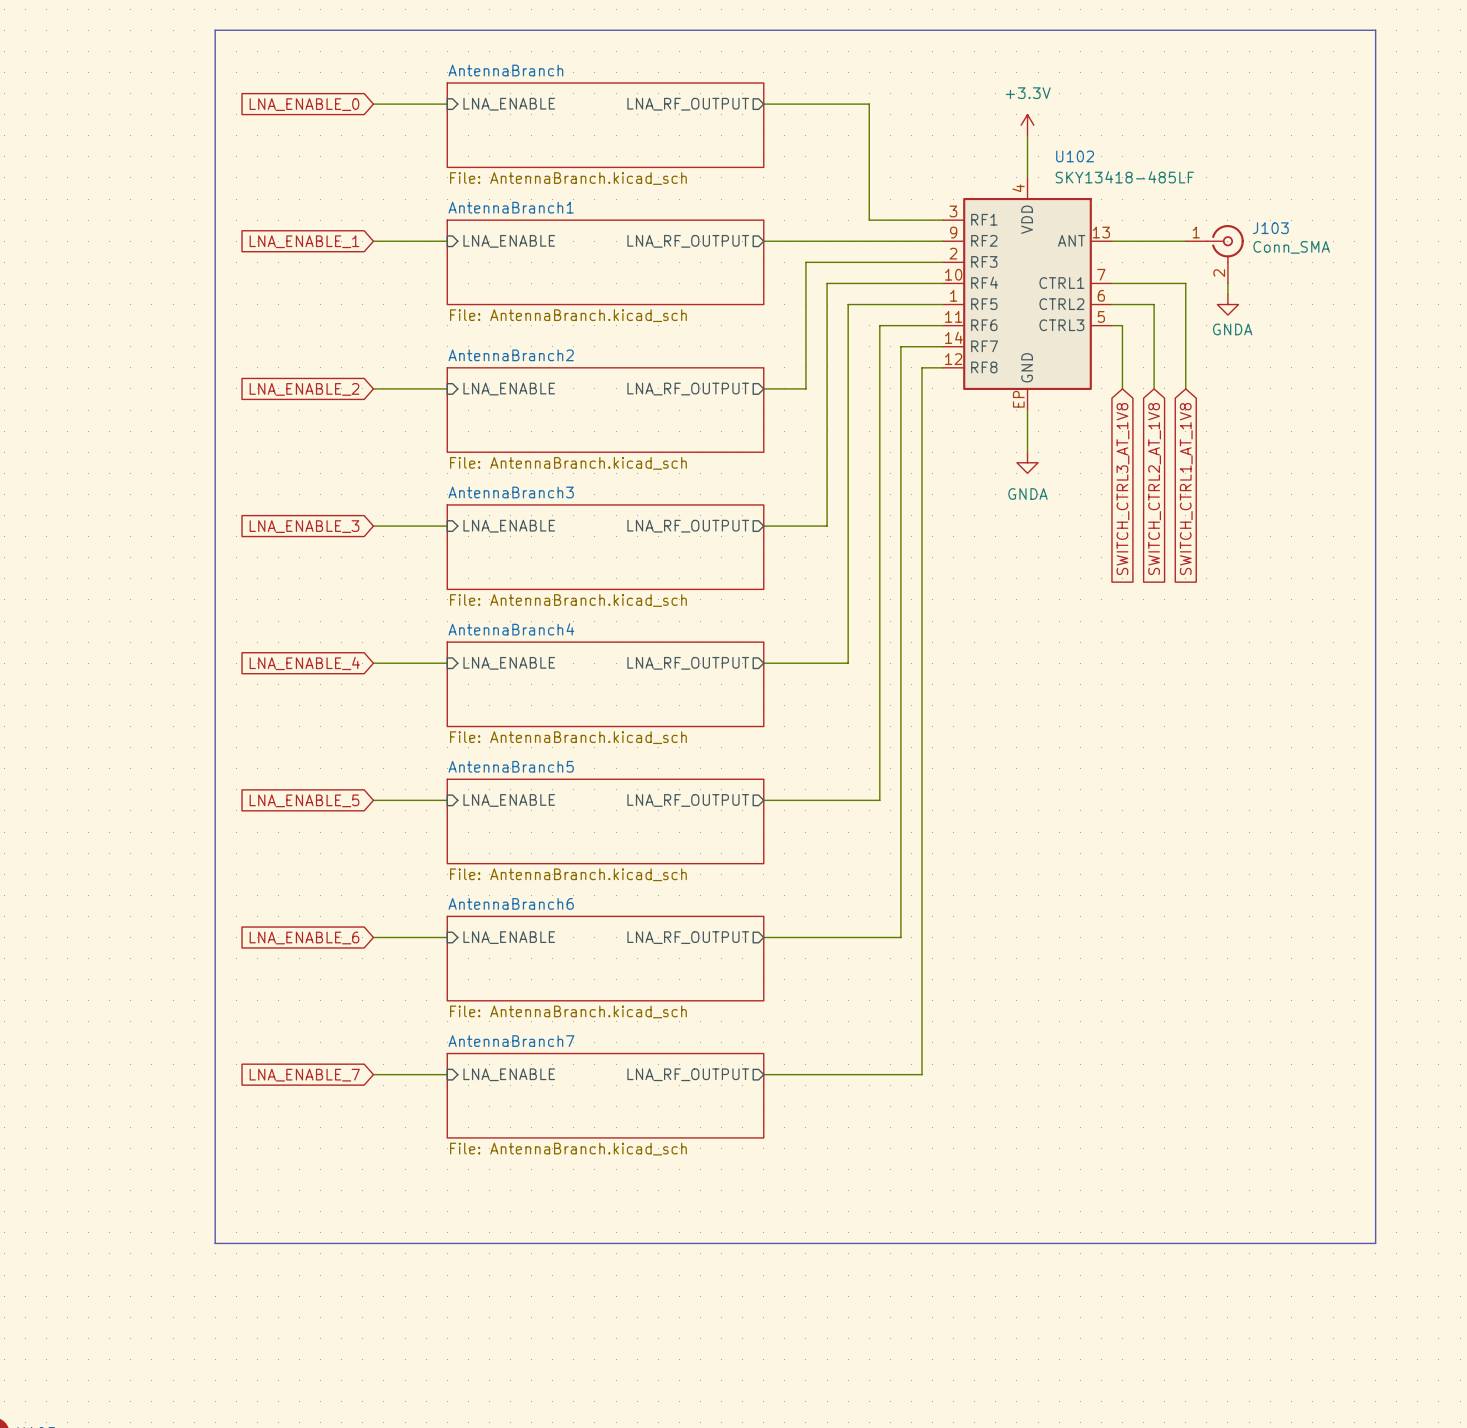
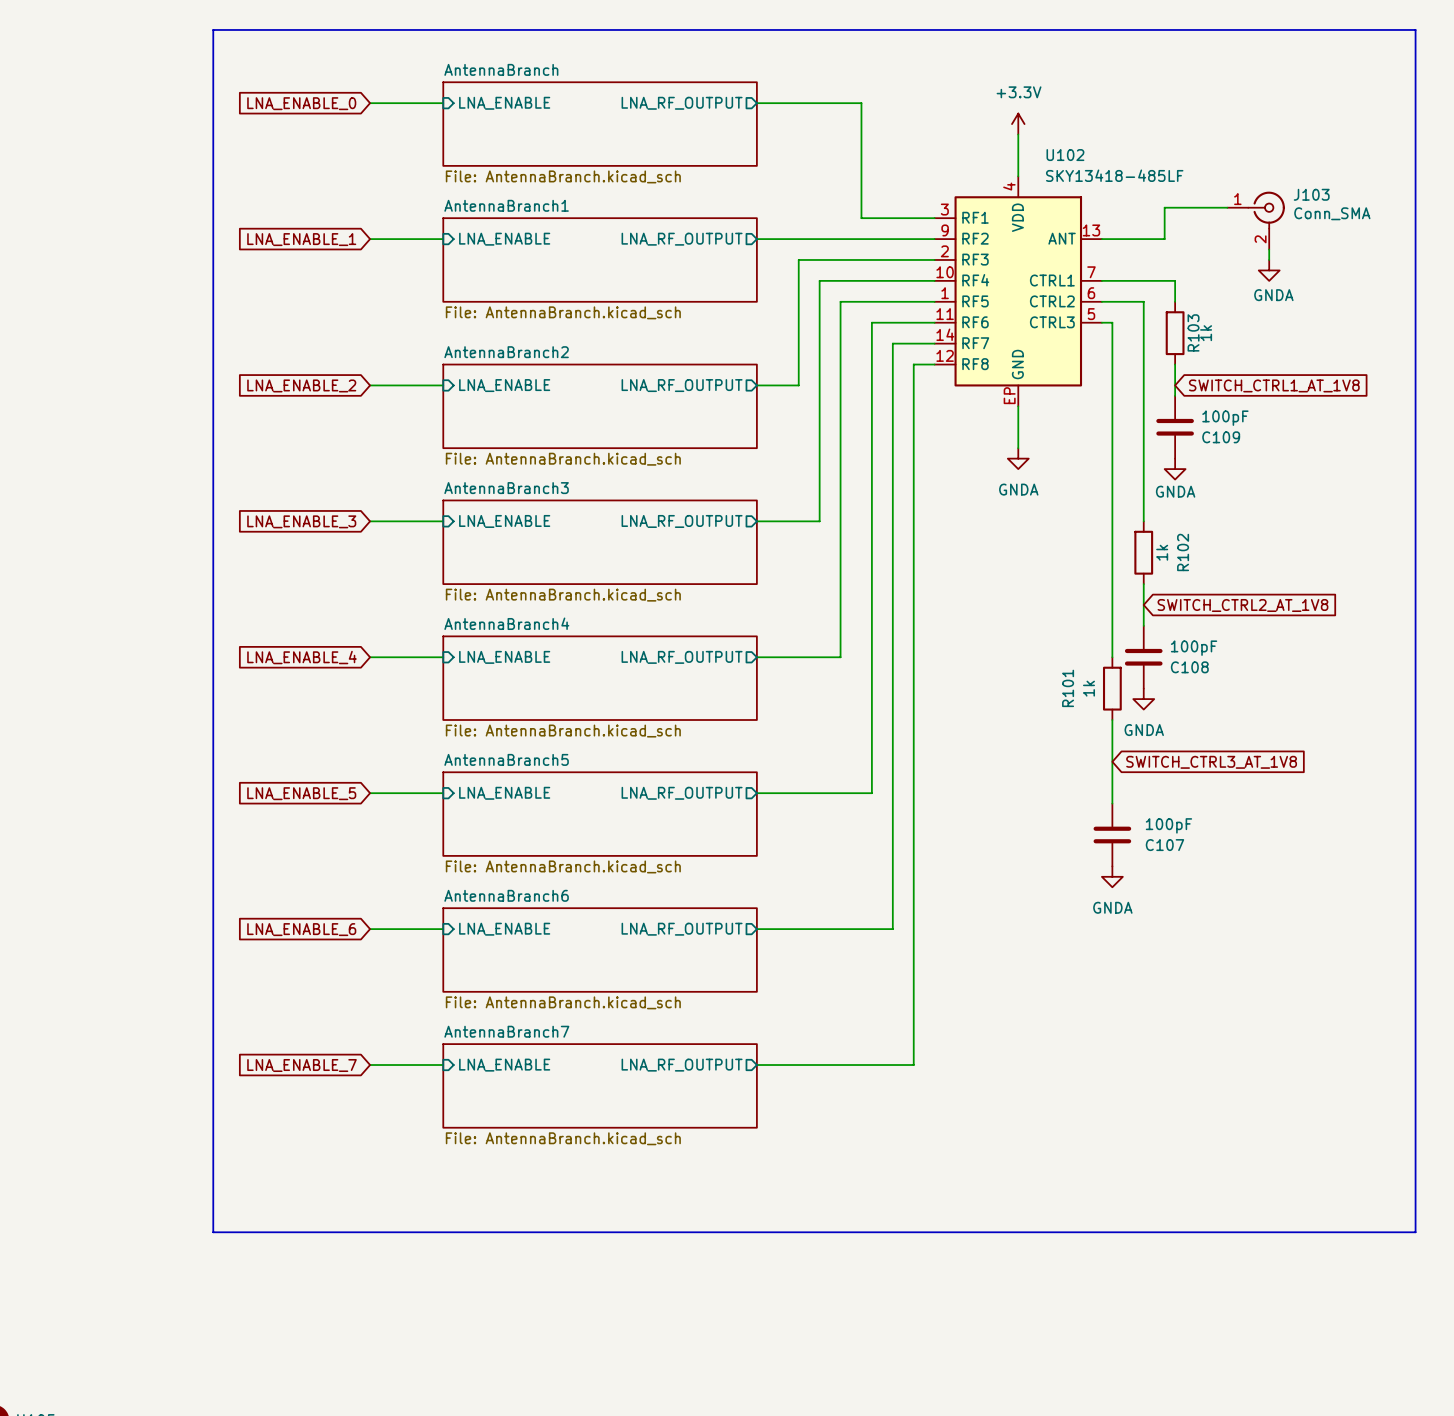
line: (1375, 30) (1375, 1243) -> (1363, 29) (1415, 29) (1415, 1232) (1363, 1232)
wire: (1175, 241) (1185, 241) -> (1164, 239) (1164, 207) (1227, 207)
J103 position: (1214, 254) -> (1256, 220)
wire: (1227, 283) (1227, 293) -> (1269, 249) (1269, 259)
wire: (1185, 304) (1185, 367) -> none
power symbol position: GNDA (1227, 304) -> GNDA (1269, 270)
R103: none -> 1k (1175, 333)
wire: none -> (1112, 385) (1112, 657)
wire: none -> (1143, 385) (1143, 521)
wire: none -> (1175, 385) (1175, 395)
C109: none -> 100pF (1175, 427)
power symbol: none -> GNDA (1175, 469)
global label: SWITCH_CTRL3_AT_1V8 (1122, 489) -> none
global label: SWITCH_CTRL2_AT_1V8 (1154, 489) -> none
global label rotation: 0° (1186, 489) -> 90° counterclockwise (1274, 385)
R102: none -> 1k (1143, 552)
wire: none -> (1143, 584) (1143, 625)
global label: none -> SWITCH_CTRL2_AT_1V8 (1242, 605)
C108: none -> 100pF (1143, 657)
R101: none -> 1k (1112, 688)
power symbol: none -> GNDA (1143, 699)
wire: none -> (1112, 720) (1112, 803)
global label: none -> SWITCH_CTRL3_AT_1V8 (1211, 762)
C107: none -> 100pF (1112, 835)
power symbol: none -> GNDA (1112, 876)

